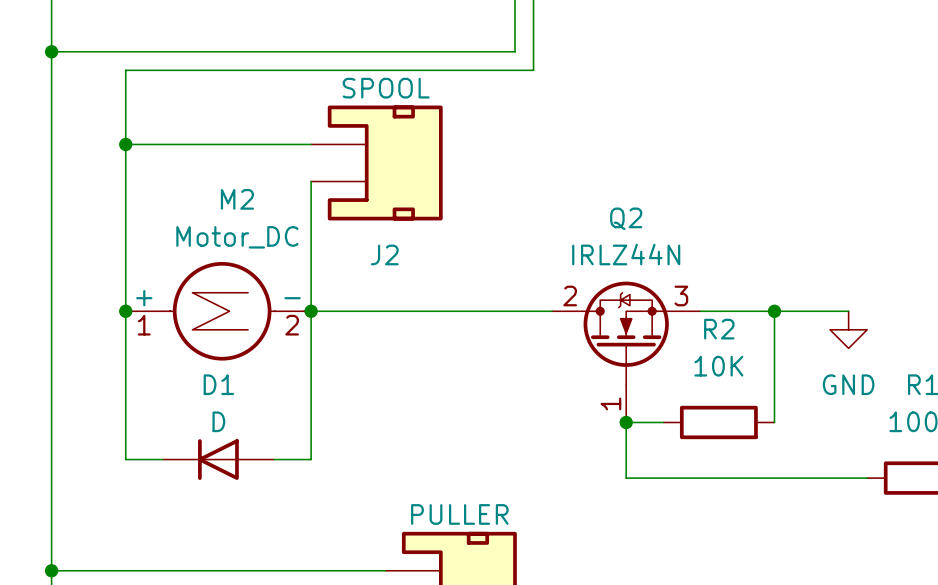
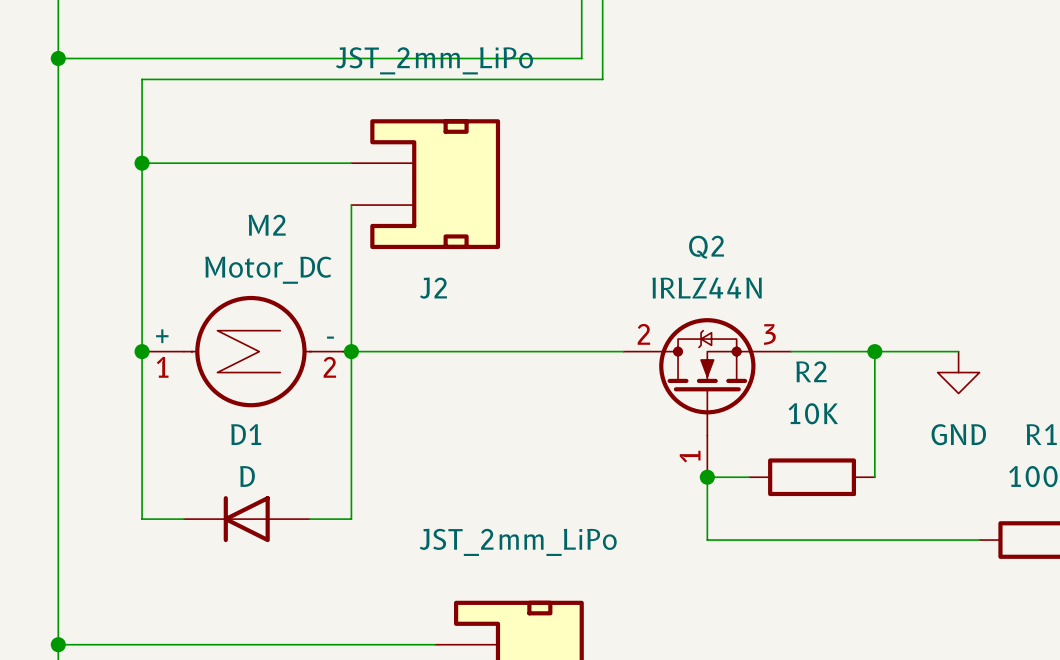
J2 value: SPOOL (386, 88) -> JST_2mm_LiPo (434, 60)
part value: PULLER (459, 514) -> JST_2mm_LiPo (518, 542)

